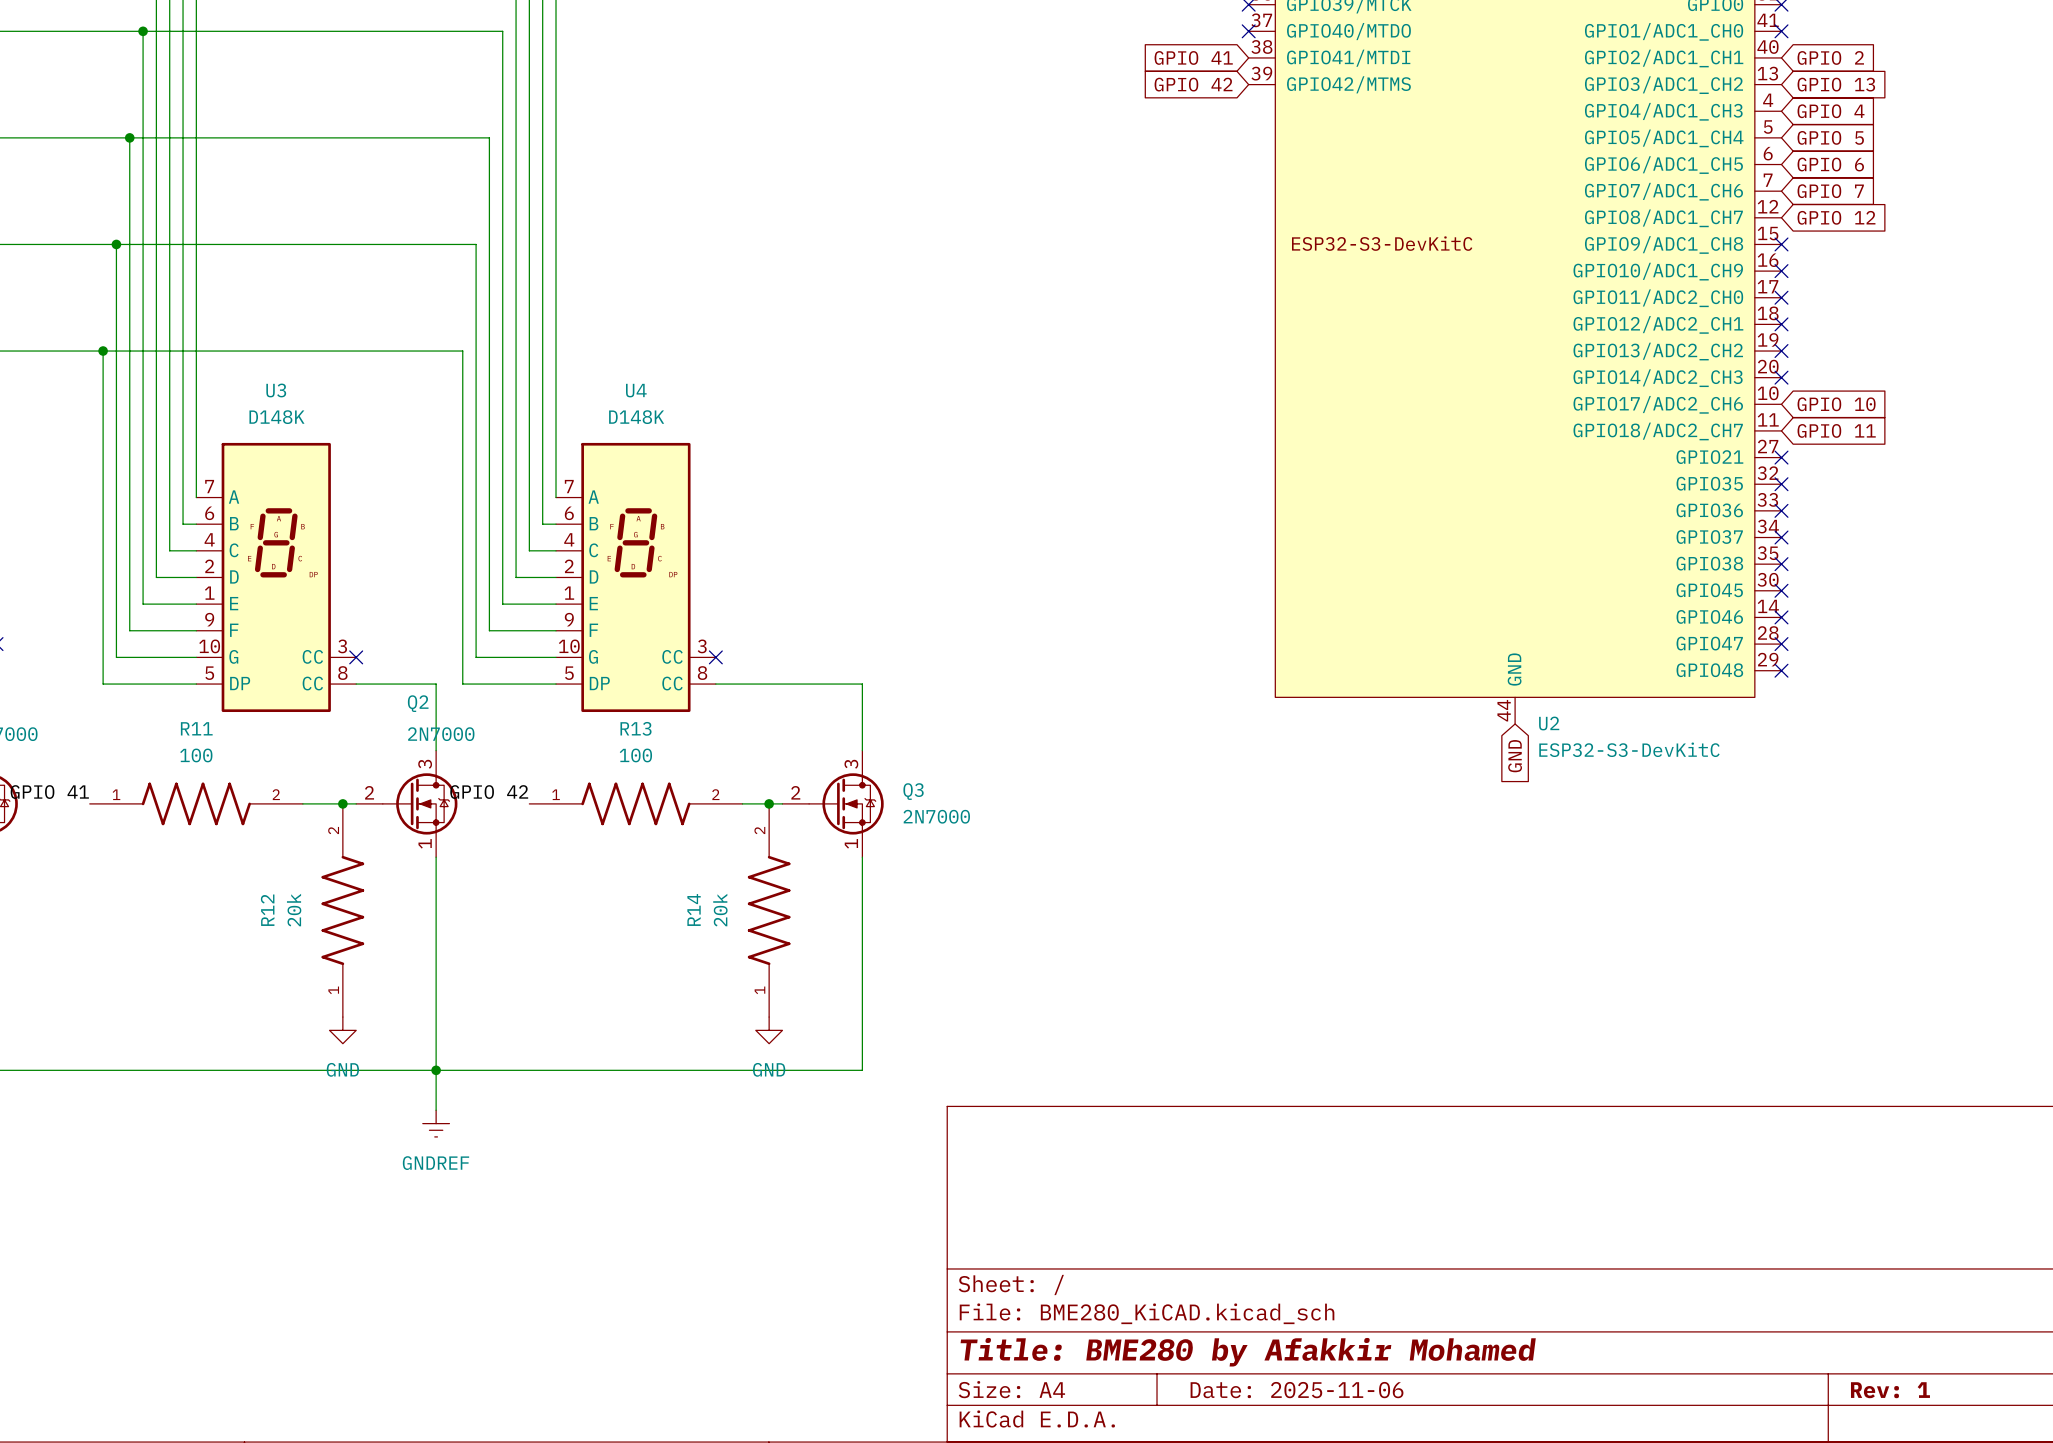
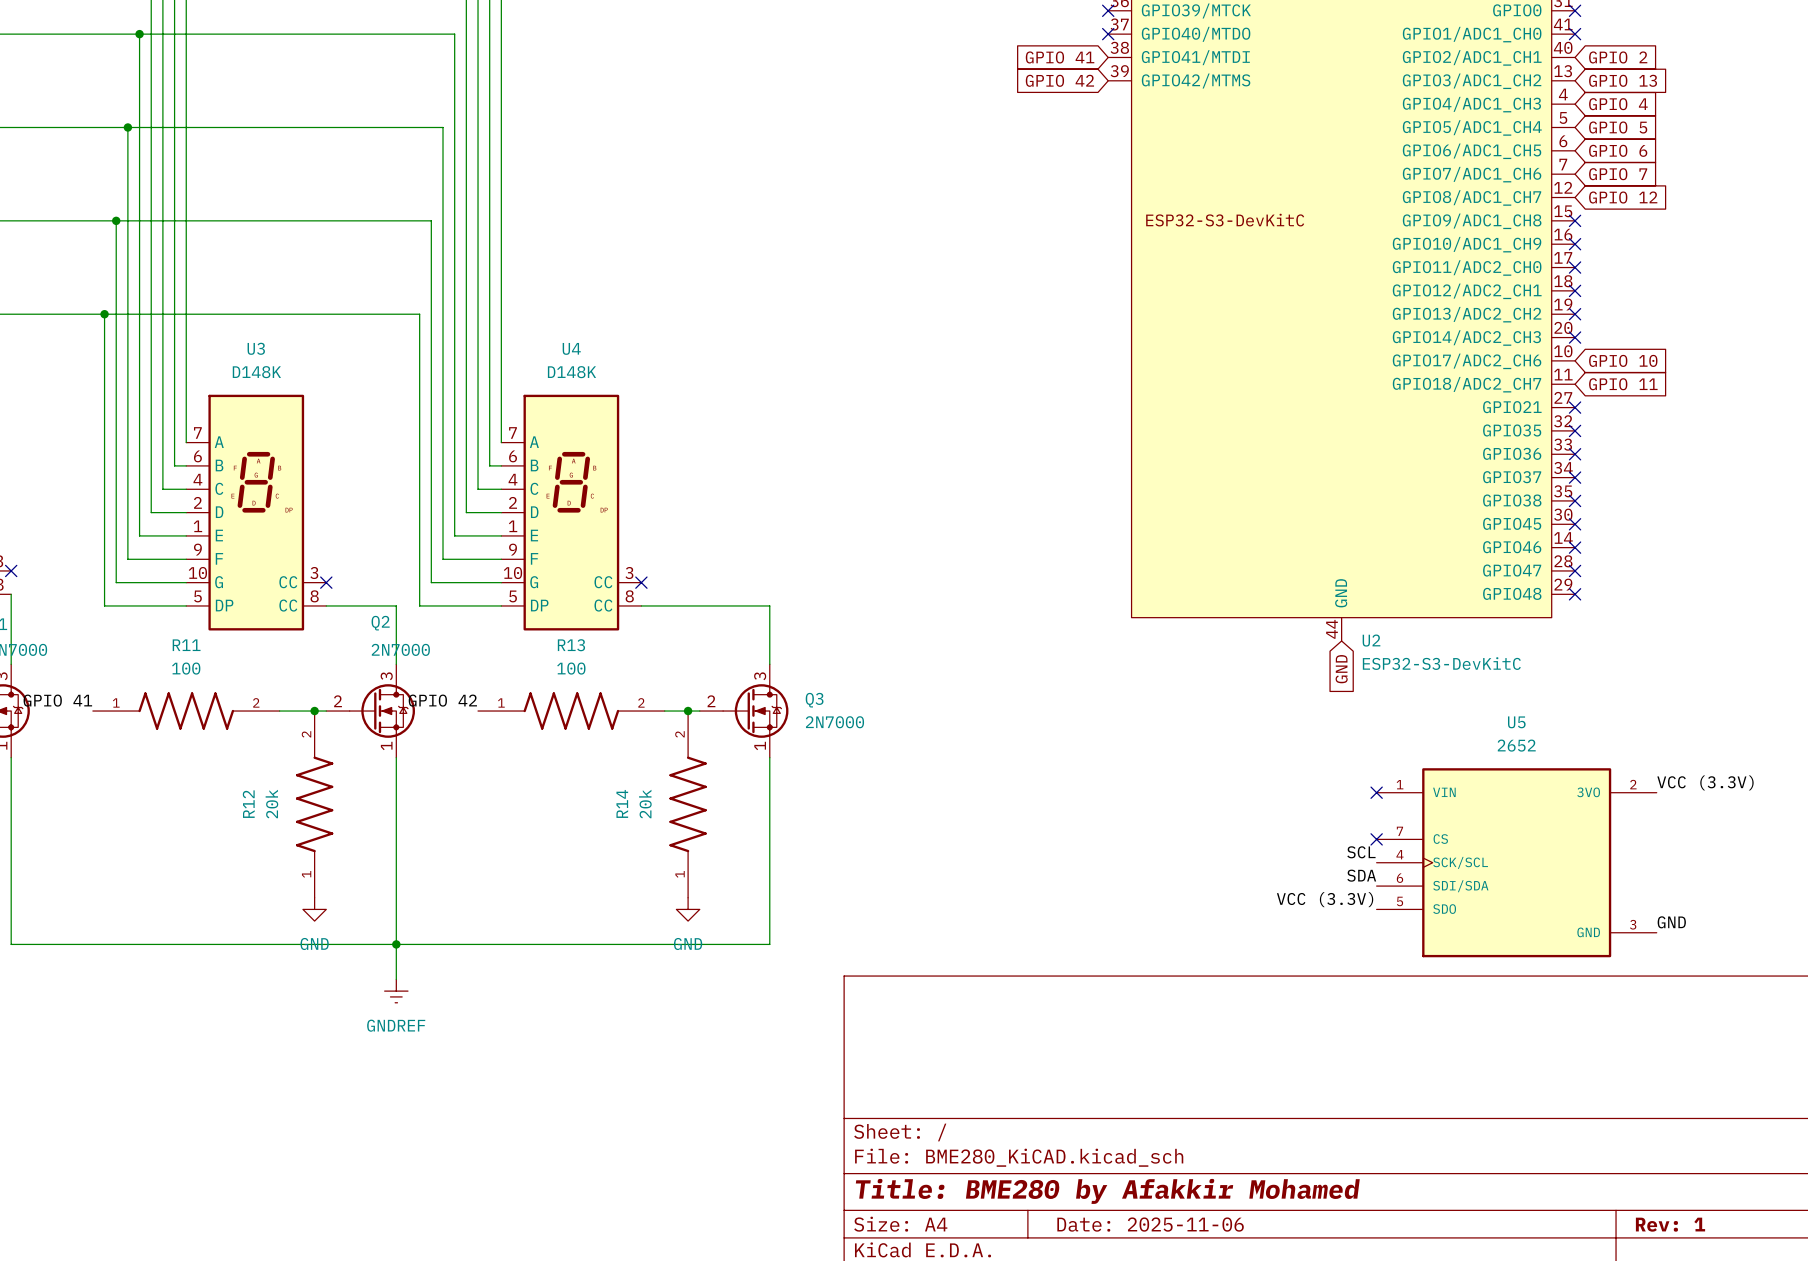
label: none -> VCC (3.3V) (1705, 782)
no-connect mark: none -> (1376, 792)
no-connect mark: none -> (1376, 839)
label: none -> SCL (1361, 852)
U5: none -> 2652 (1516, 862)
label: none -> SDA (1361, 875)
label: none -> VCC (3.3V) (1325, 899)
label: none -> GND (1671, 922)

